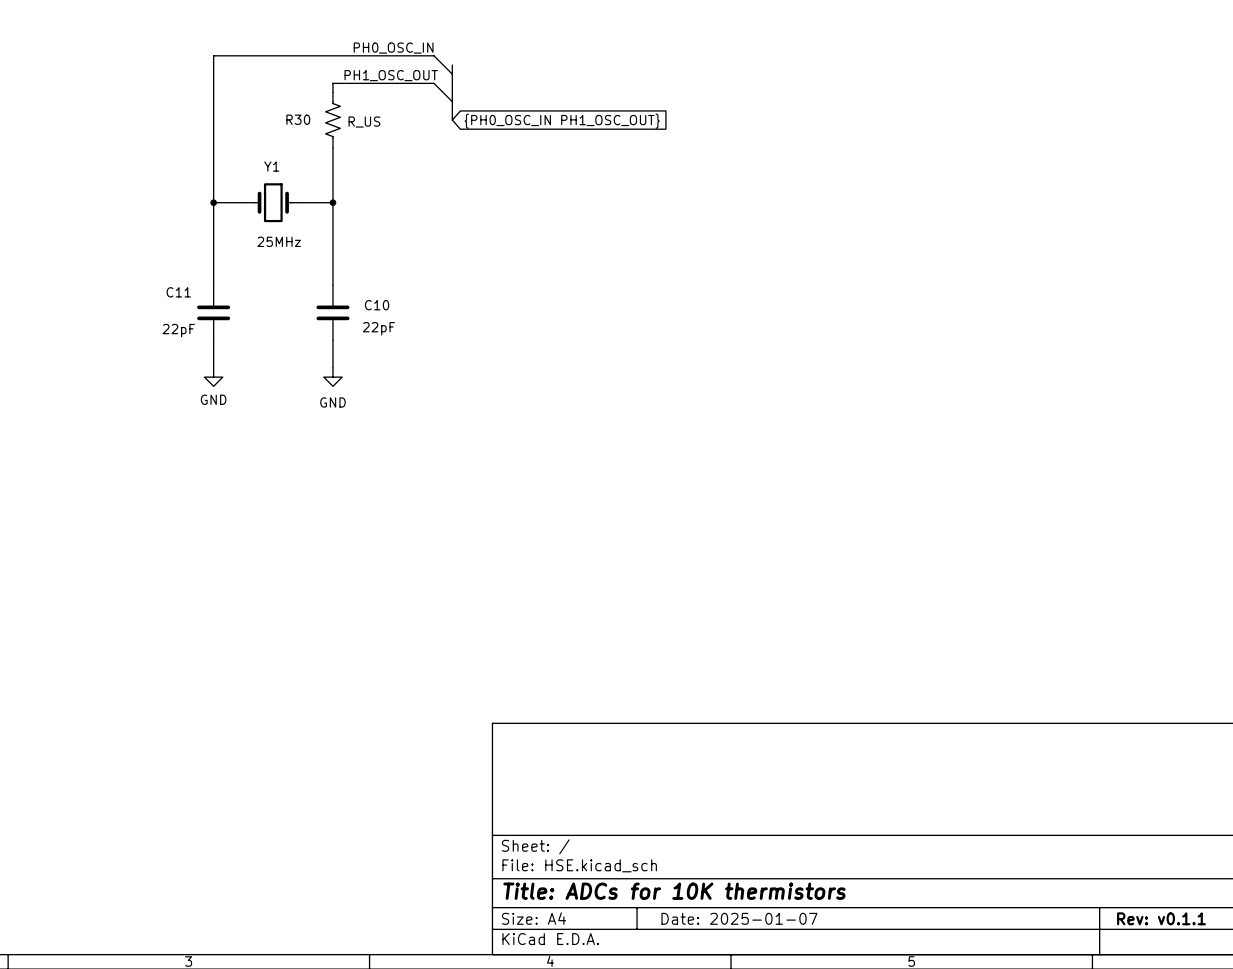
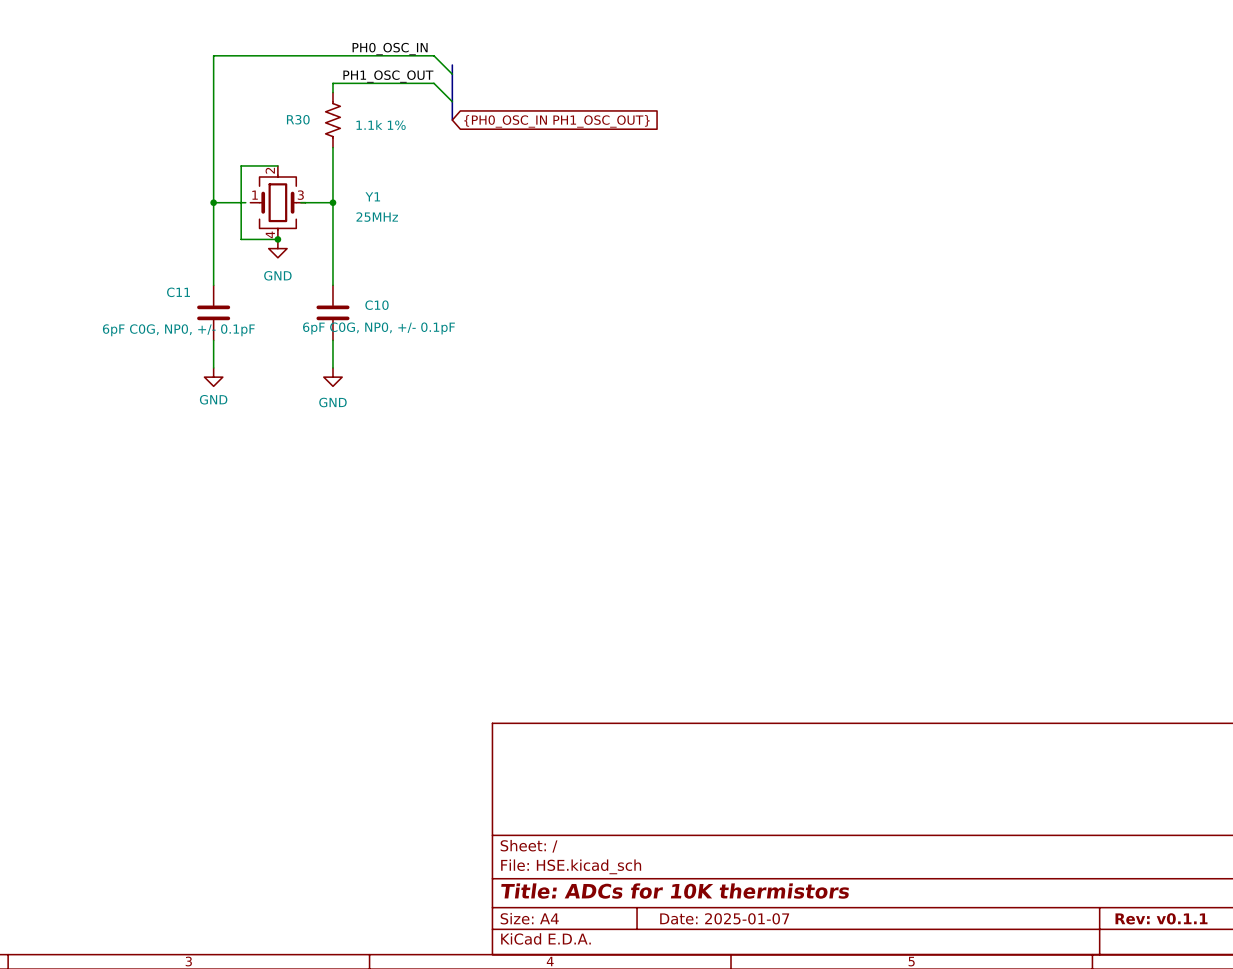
R30 value: R_US (364, 122) -> 1.1k 1% (381, 125)
wire: none -> (277, 165) (241, 165) (241, 239) (277, 239)
Y1 name position: Y1 (271, 166) -> Y1 (372, 196)
Y1 symbol: [245, 183, 301, 223] -> [250, 165, 306, 240]
junction: none -> (277, 239)
Y1 value position: 25MHz (279, 241) -> 25MHz (377, 217)
power symbol: none -> GND (277, 248)
C10 value: 22pF (378, 328) -> 6pF C0G, NP0, +/- 0.1pF (378, 328)
C11 value: 22pF (178, 330) -> 6pF C0G, NP0, +/- 0.1pF (178, 330)

